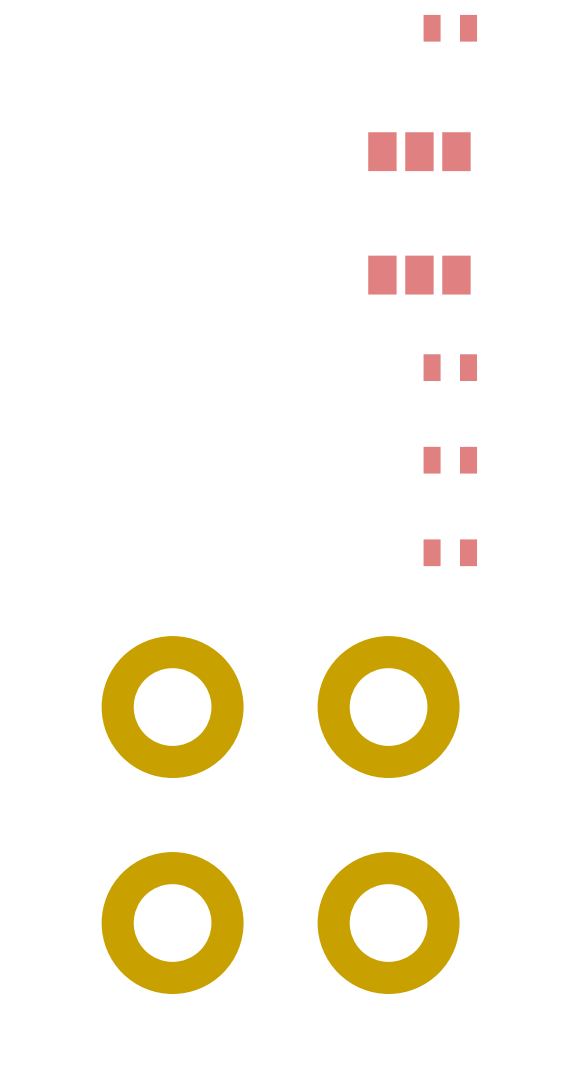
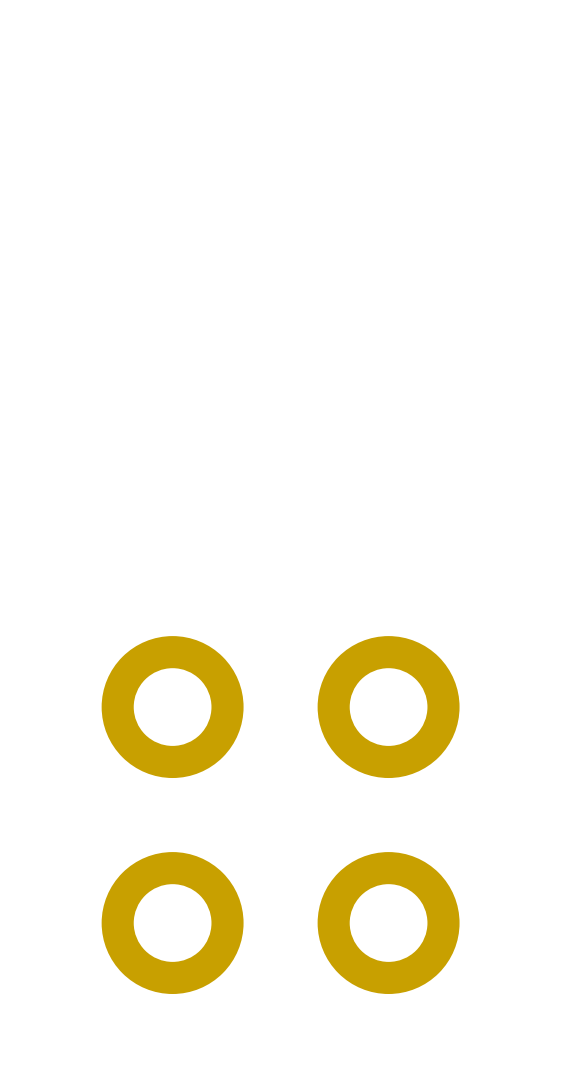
part: (450, 28) -> none
part: (419, 151) -> none
part: (419, 275) -> none
part: (450, 367) -> none
part: (450, 460) -> none
part: (450, 552) -> none

